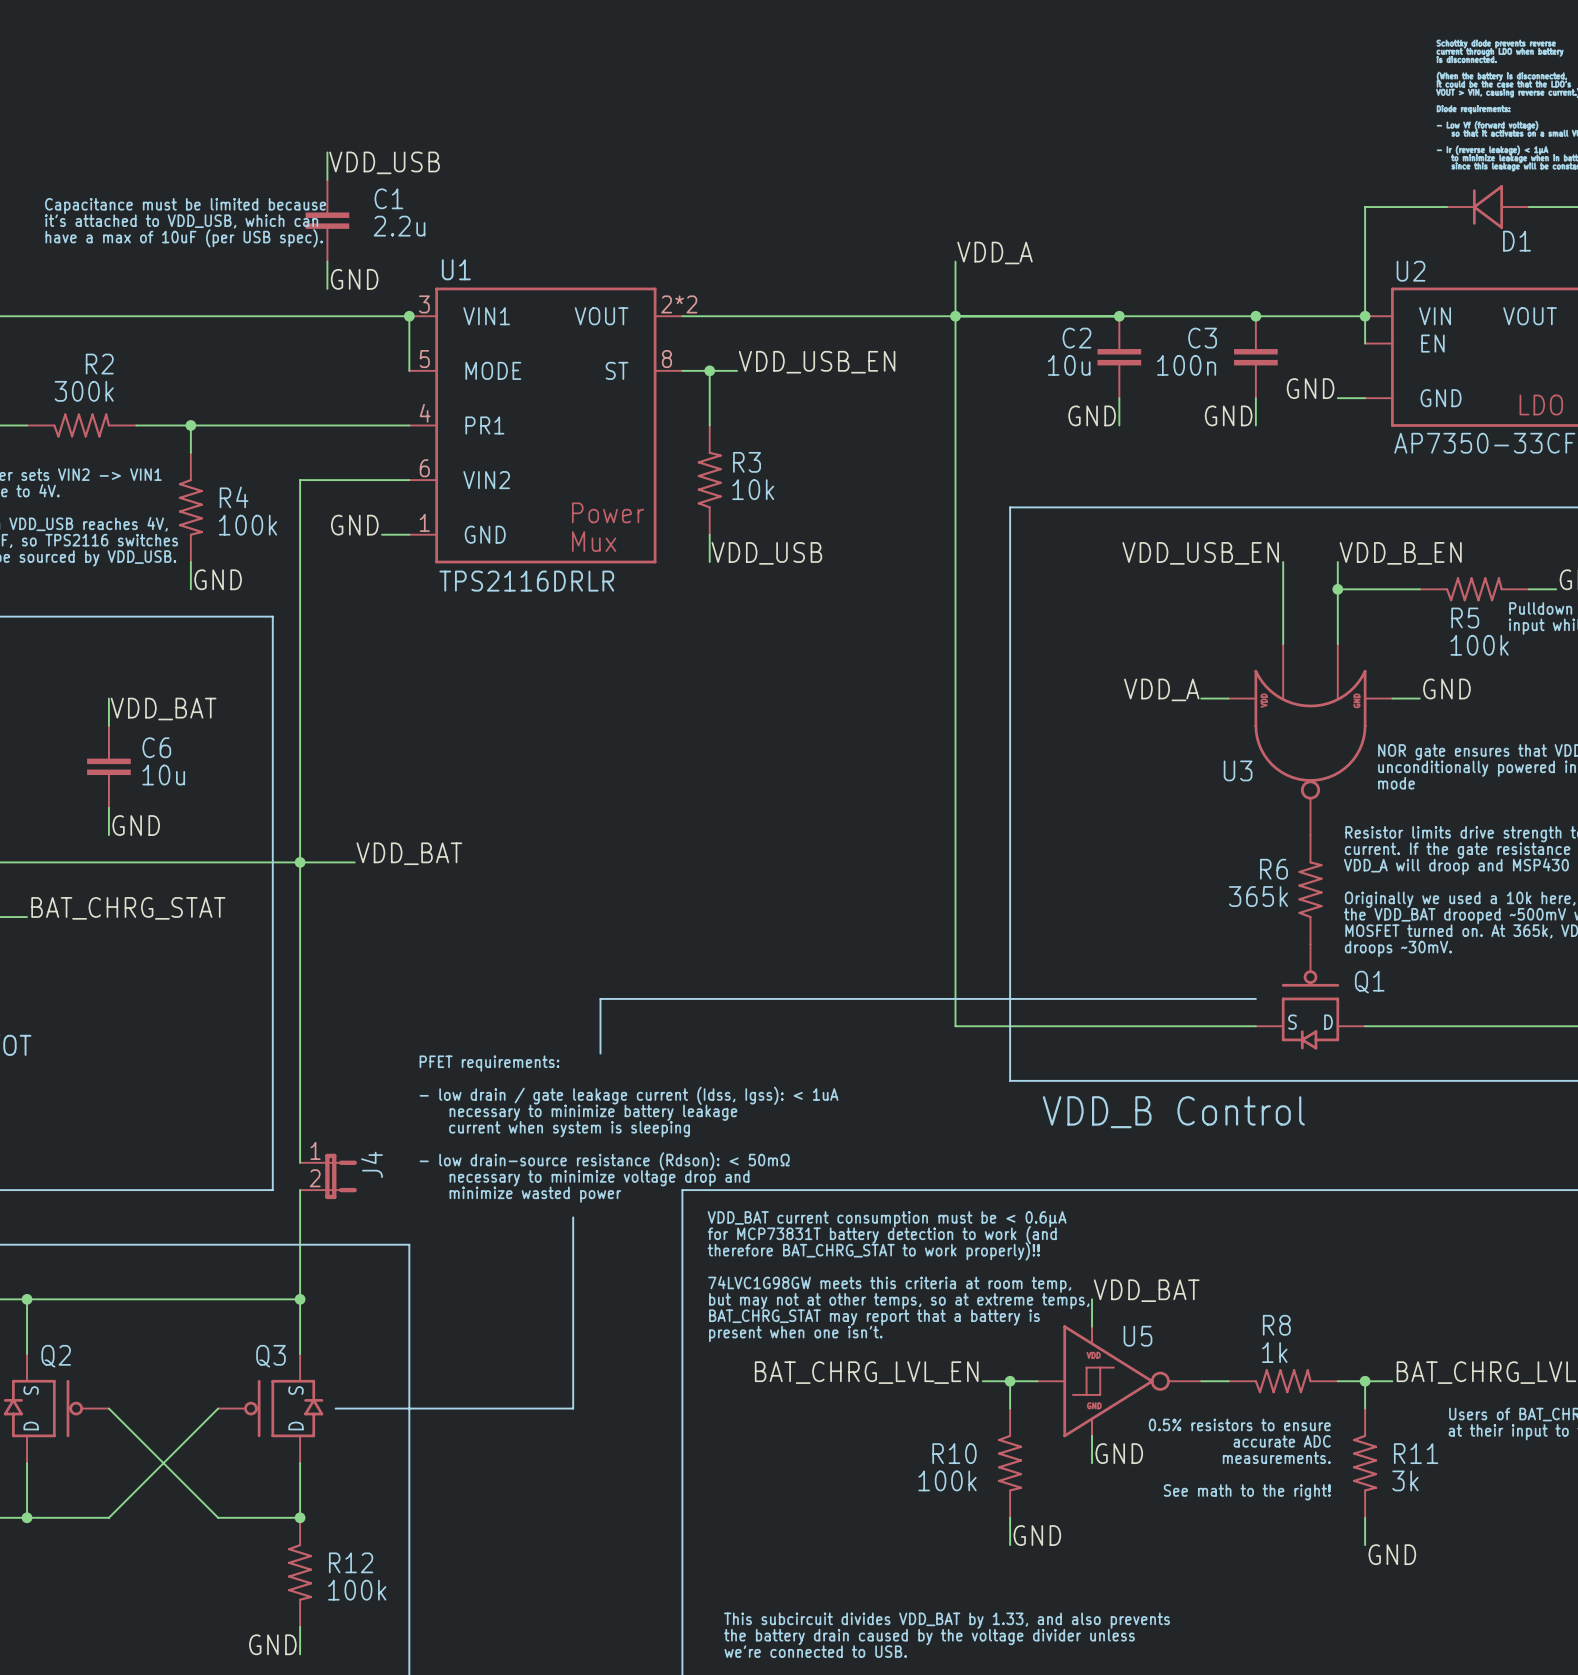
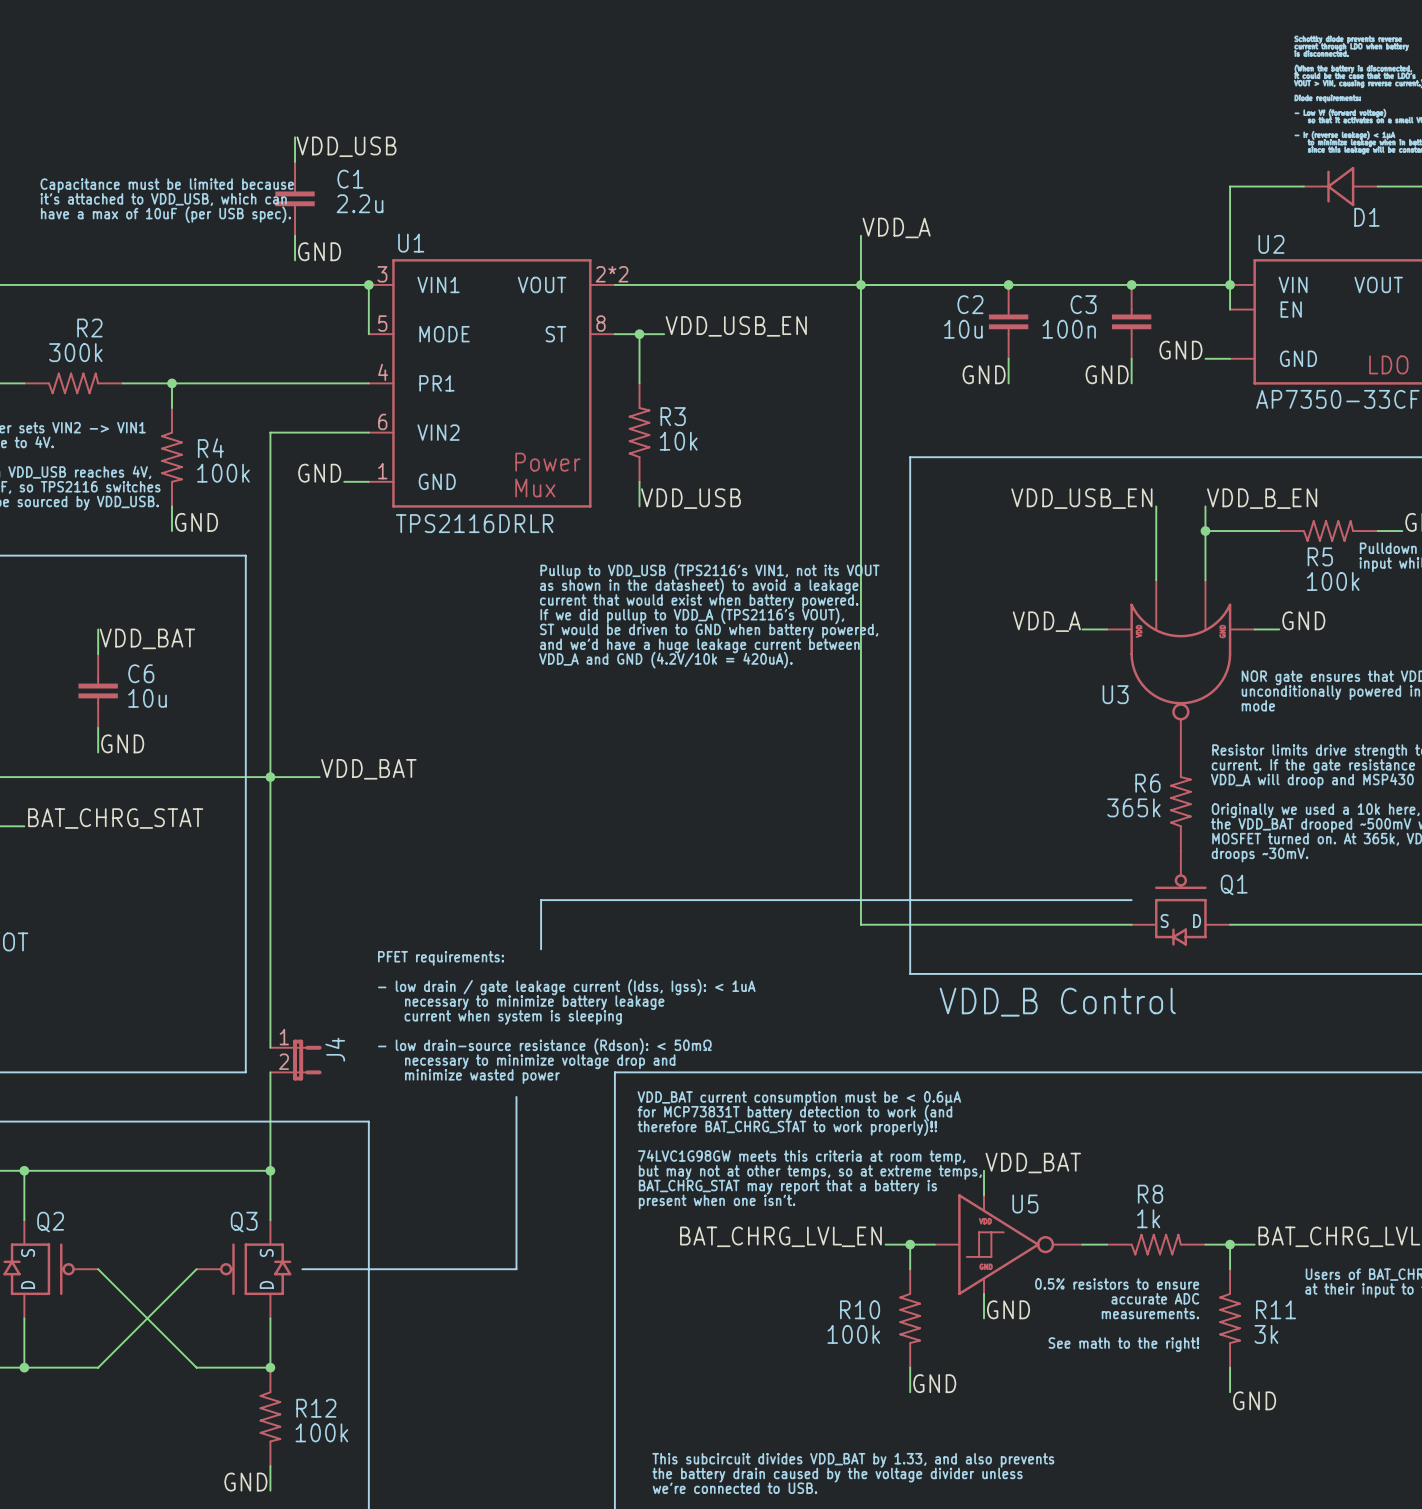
text: none -> Pullup to VDD_USB (TPS2116's VIN1, not its VOUT (709, 571)
text: none -> as shown in the datasheet) to avoid a leakage (699, 586)
text: none -> current that would exist when battery powered. (699, 601)
text: none -> If we did pullup to VDD_A (TPS2116's VOUT), (692, 615)
text: none -> ST would be driven to GND when battery powered, (709, 631)
text: none -> and we'd have a huge leakage current between (699, 645)
text: none -> VDD_A and GND (4.2V/10k = 420uA). (665, 660)

